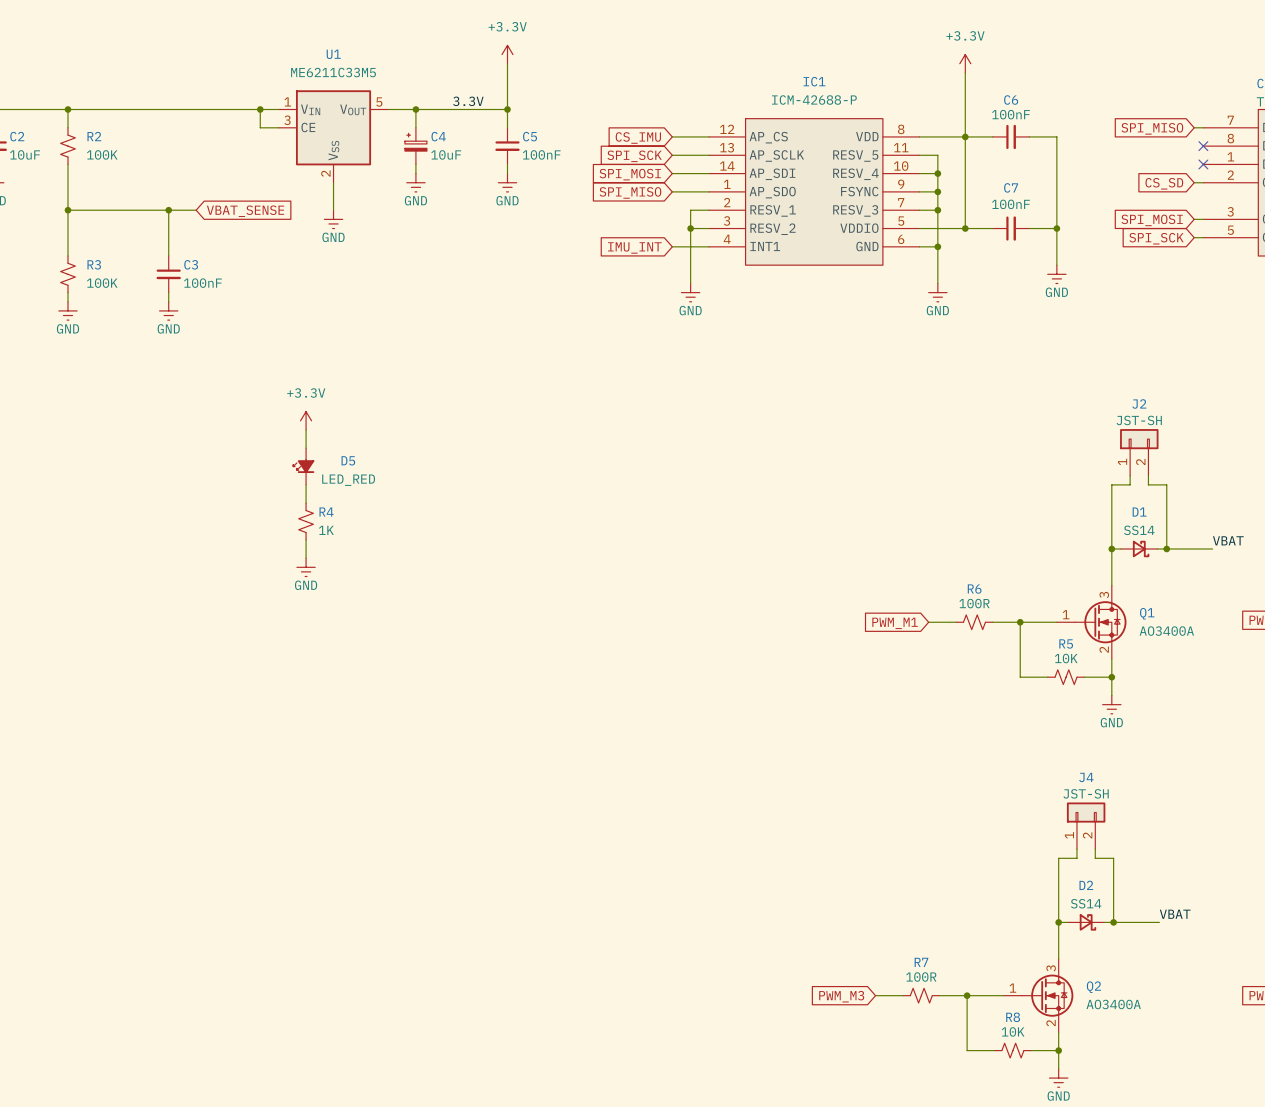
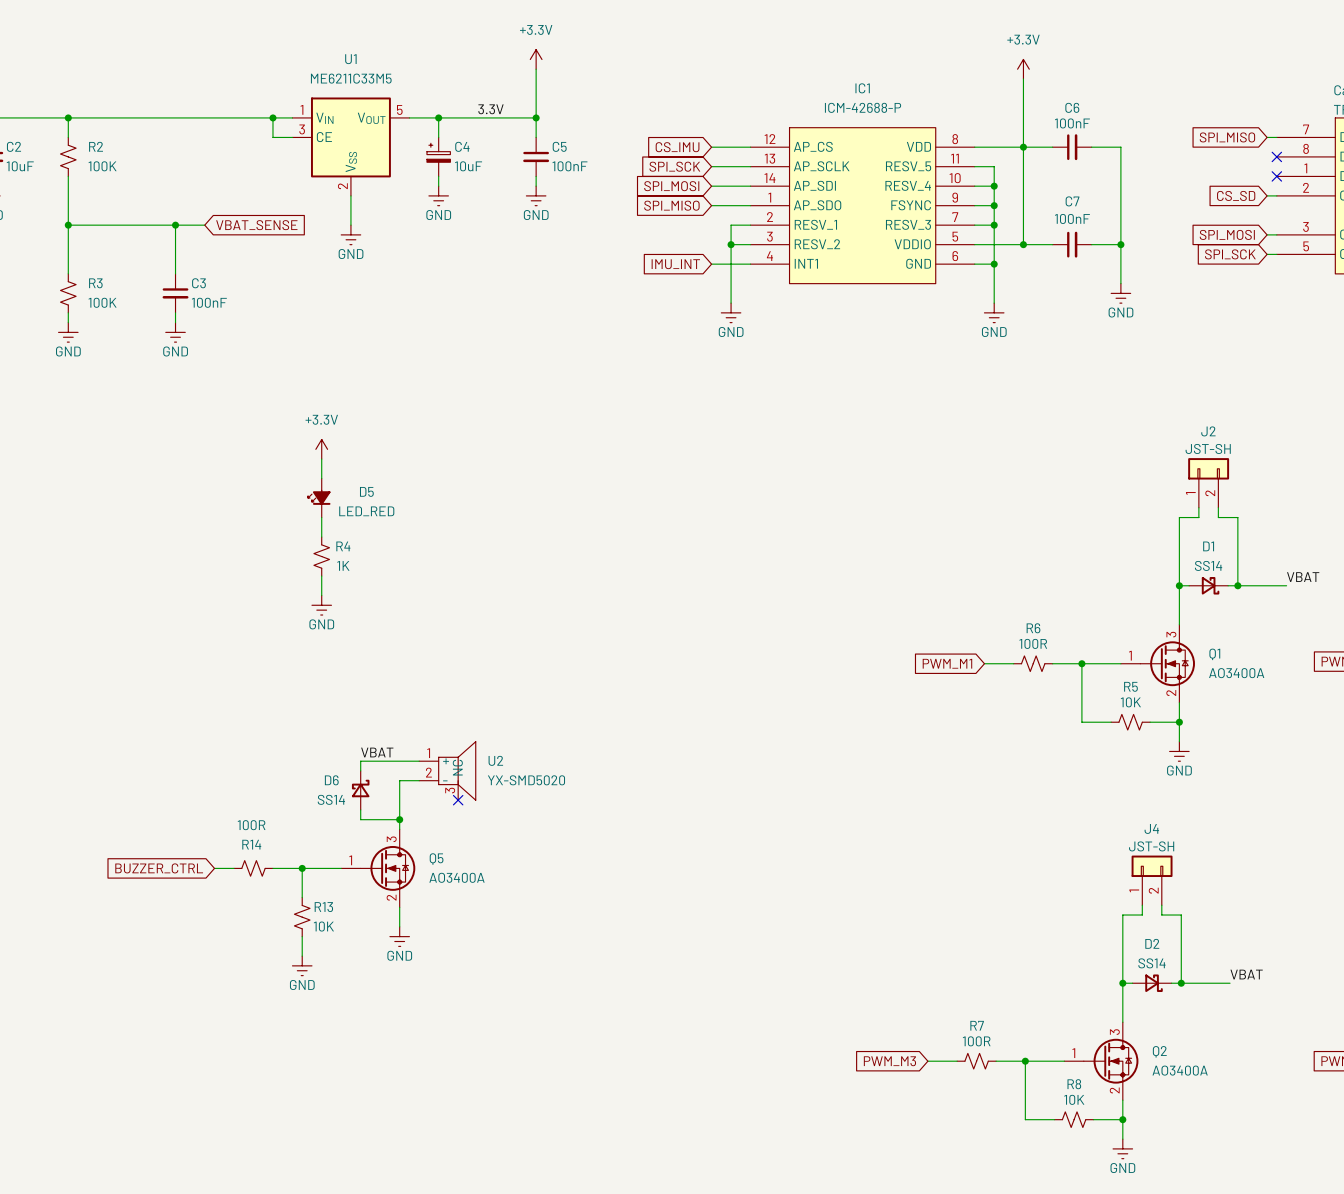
label: none -> VBAT (377, 752)
wire: none -> (419, 761) (360, 761) (360, 770)
U2: none -> YX-SMD5020 (447, 770)
wire: none -> (419, 780) (399, 780) (399, 829)
D6: none -> SS14 (360, 790)
no-connect mark: none -> (458, 800)
wire: none -> (360, 809) (360, 819) (399, 819)
junction: none -> (399, 819)
wire: none -> (214, 868) (234, 868)
R14: none -> 100R (253, 868)
wire: none -> (272, 868) (341, 868)
wire: none -> (302, 868) (302, 897)
junction: none -> (302, 868)
Q5: none -> AO3400A (378, 868)
global label: none -> BUZZER_CTRL (159, 868)
wire: none -> (399, 907) (399, 926)
R13: none -> 10K (302, 917)
wire: none -> (302, 936) (302, 956)
power symbol: none -> GND (399, 936)
power symbol: none -> GND (302, 965)

